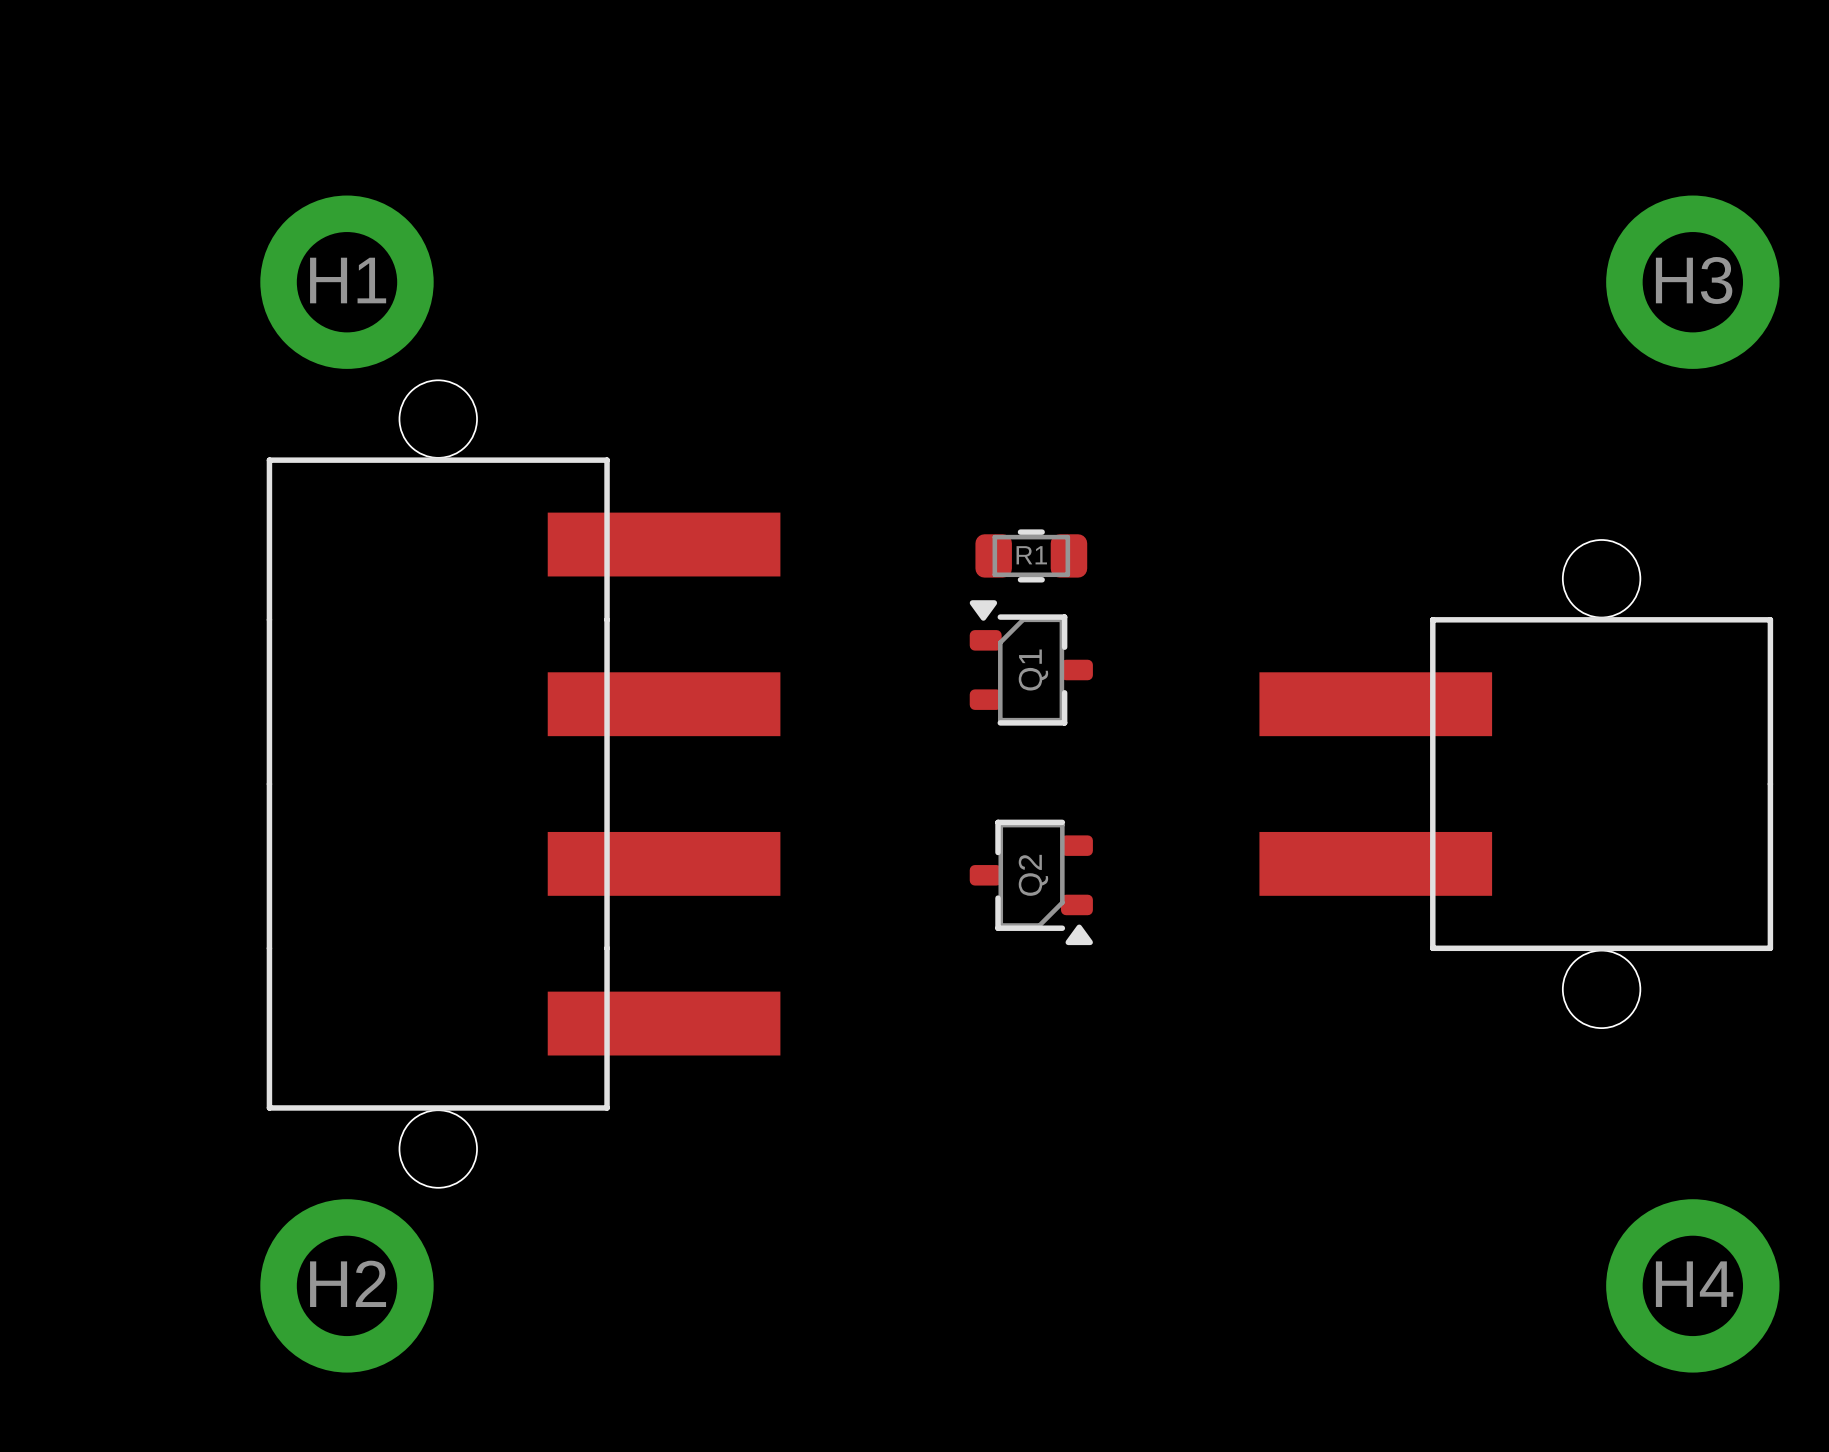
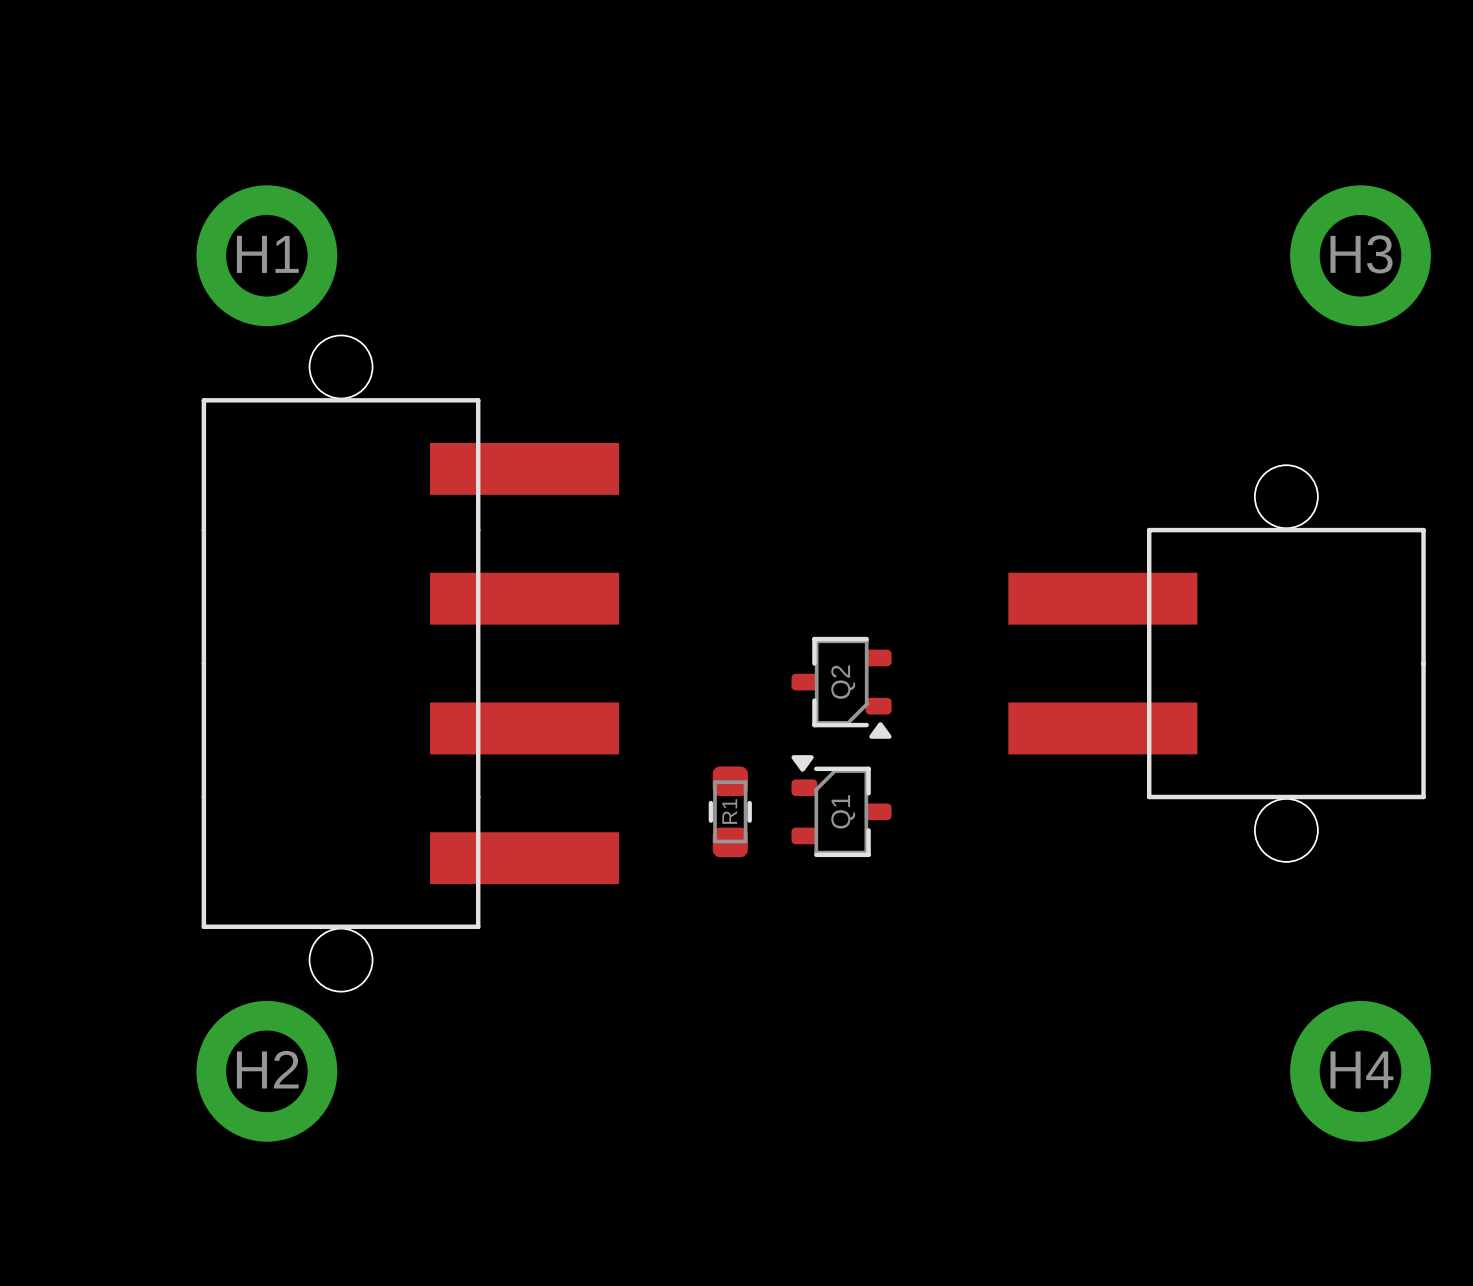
R1 rotation: 0° (1031, 555) -> 90° clockwise (730, 811)
R1 position: (1031, 555) -> (730, 811)
Q1 position: (1031, 662) -> (841, 806)
Q2 position: (1031, 882) -> (841, 687)

